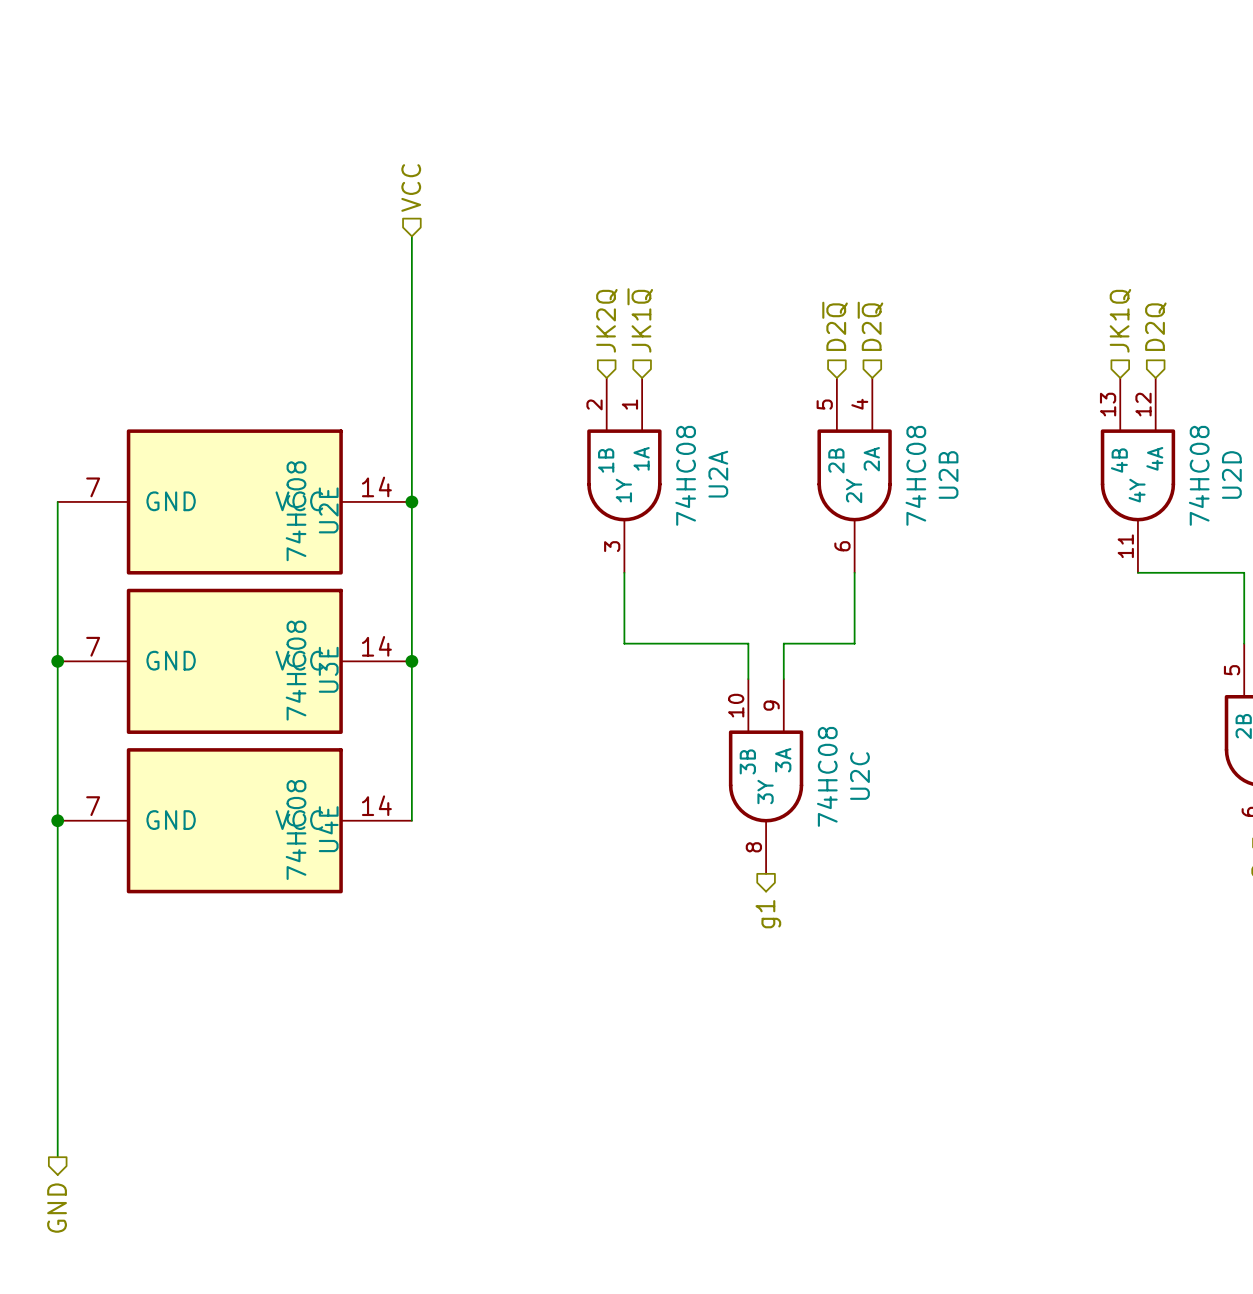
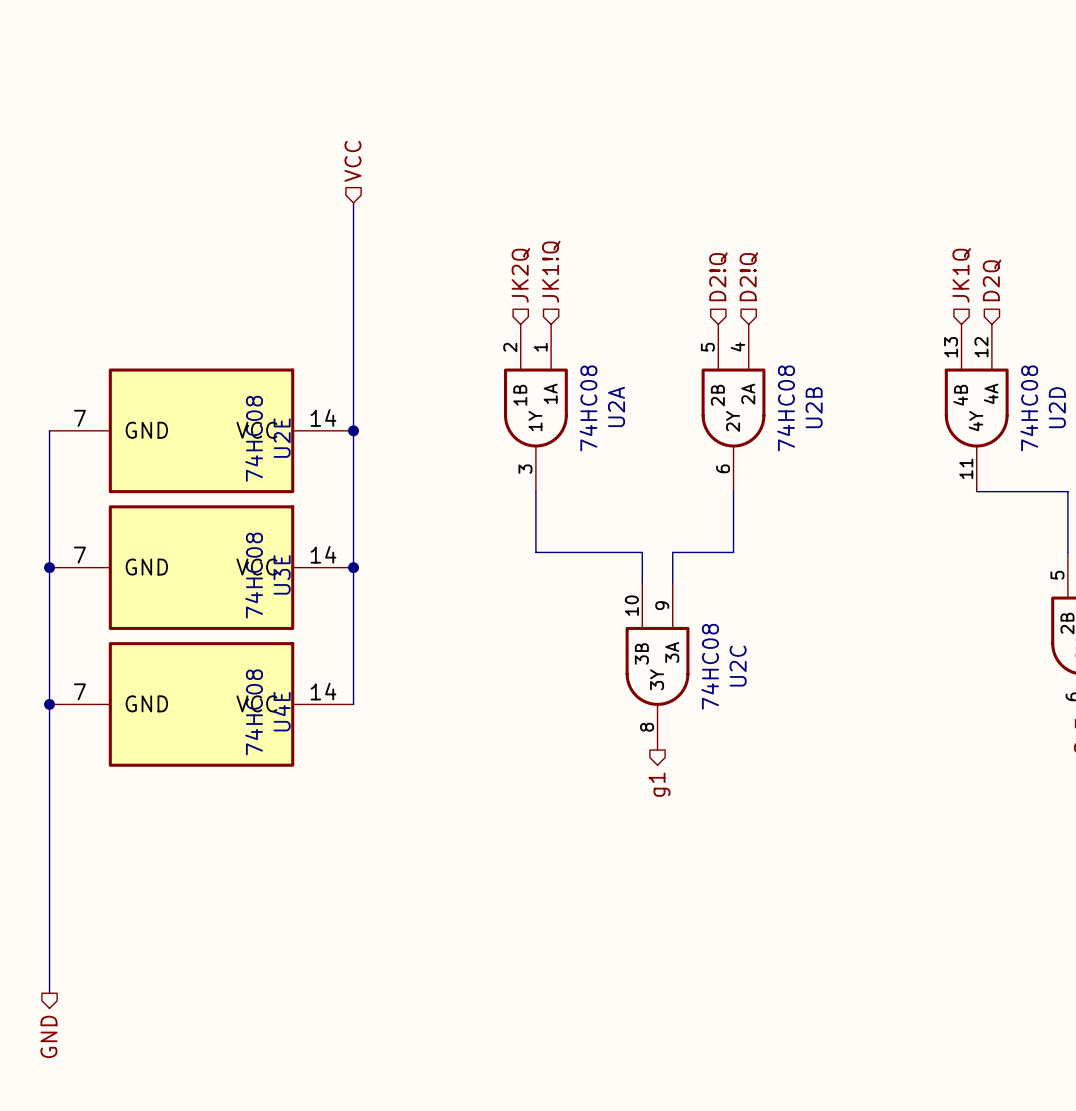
hierarchical label: JK1~{Q} (640, 320) -> JK1!Q (551, 271)
hierarchical label: D2~{Q} (835, 326) -> D2!Q (718, 276)
hierarchical label: D2~{Q} (870, 326) -> D2!Q (748, 276)

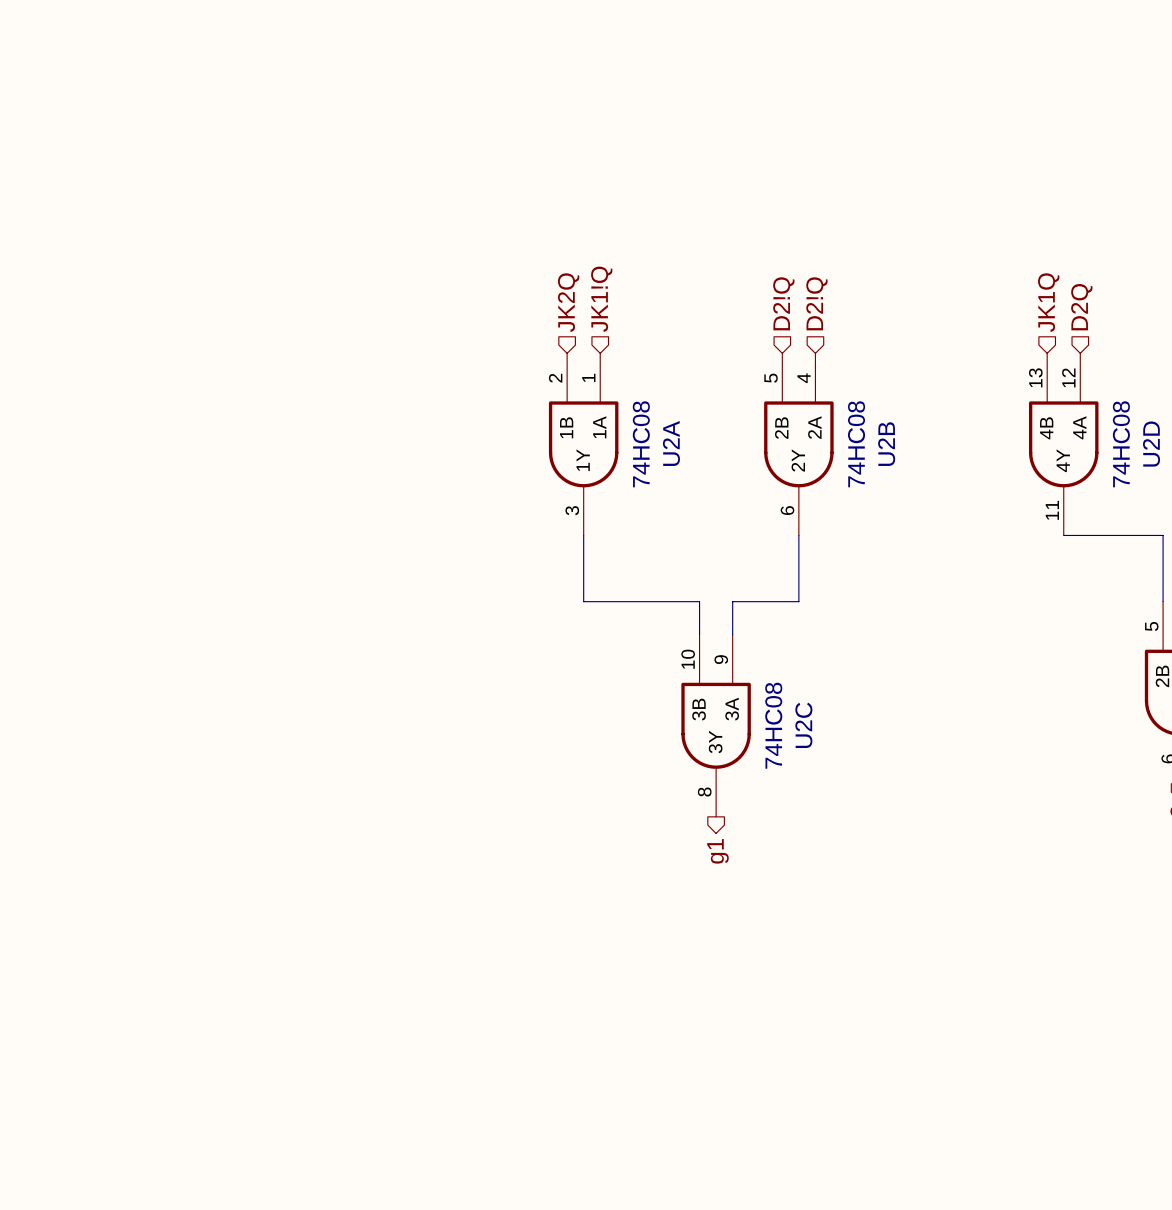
hierarchical label: VCC (352, 161) -> none
wire: (353, 202) (353, 704) -> none
wire: (49, 430) (49, 993) -> none
U2E: 74HC08 (201, 430) -> none
junction: (353, 430) -> none
junction: (49, 567) -> none
U3E: 74HC08 (201, 567) -> none
junction: (353, 567) -> none
junction: (49, 704) -> none
U4E: 74HC08 (201, 704) -> none
hierarchical label: GND (48, 1036) -> none

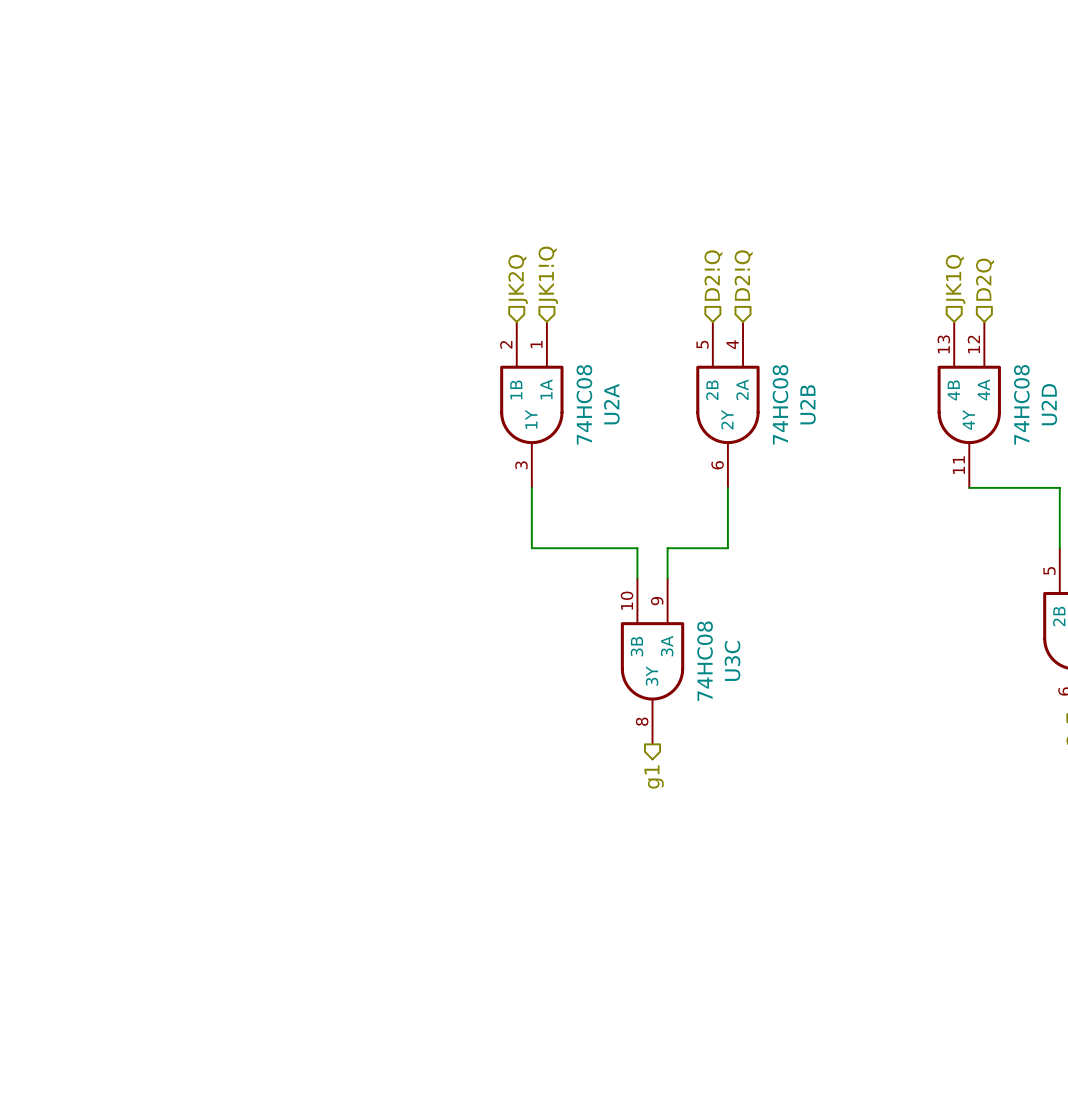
U2C name: U2C (803, 725) -> U3C (732, 661)

